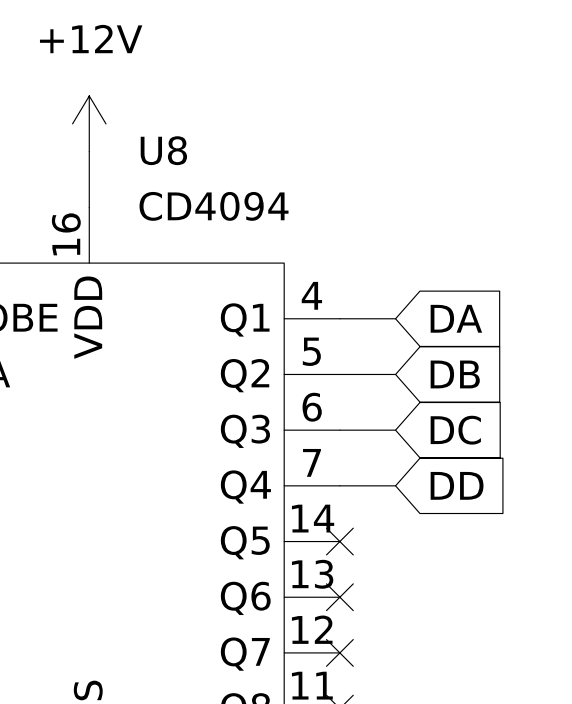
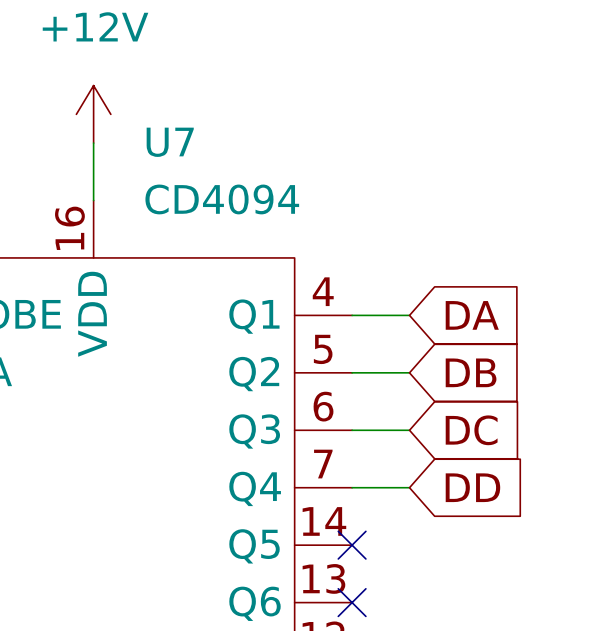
U8 name: U8 (163, 150) -> U7 (170, 142)

